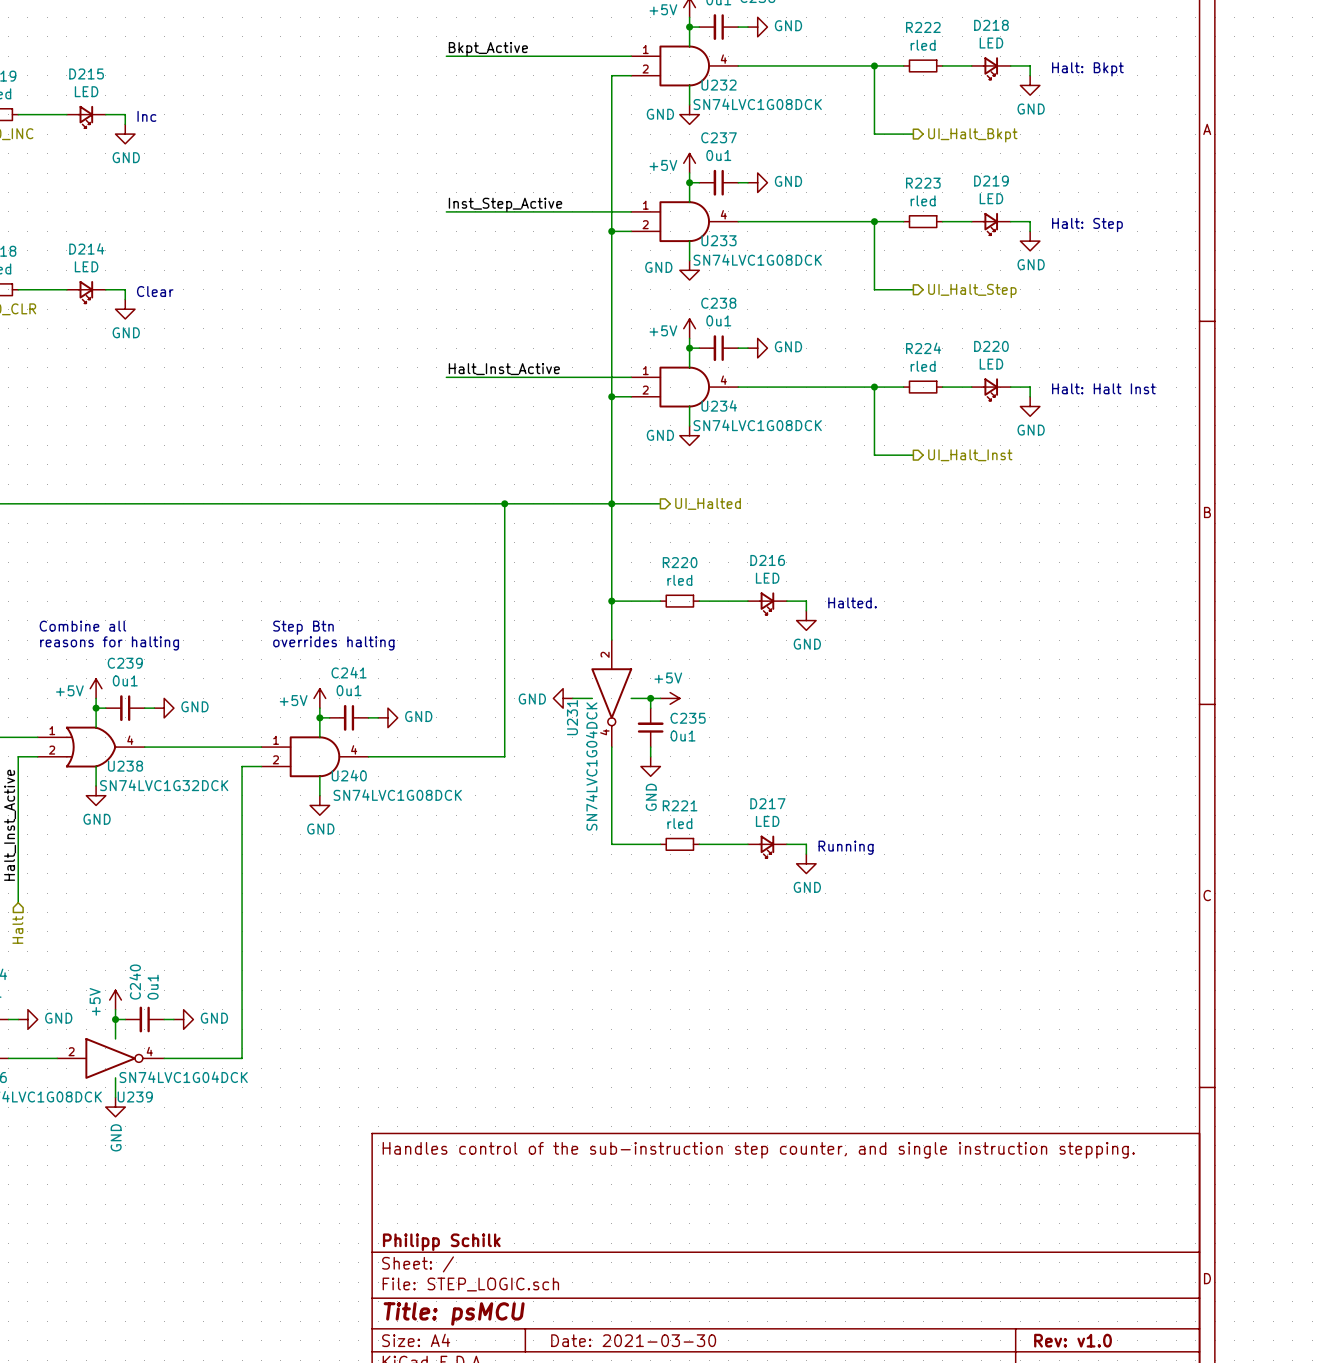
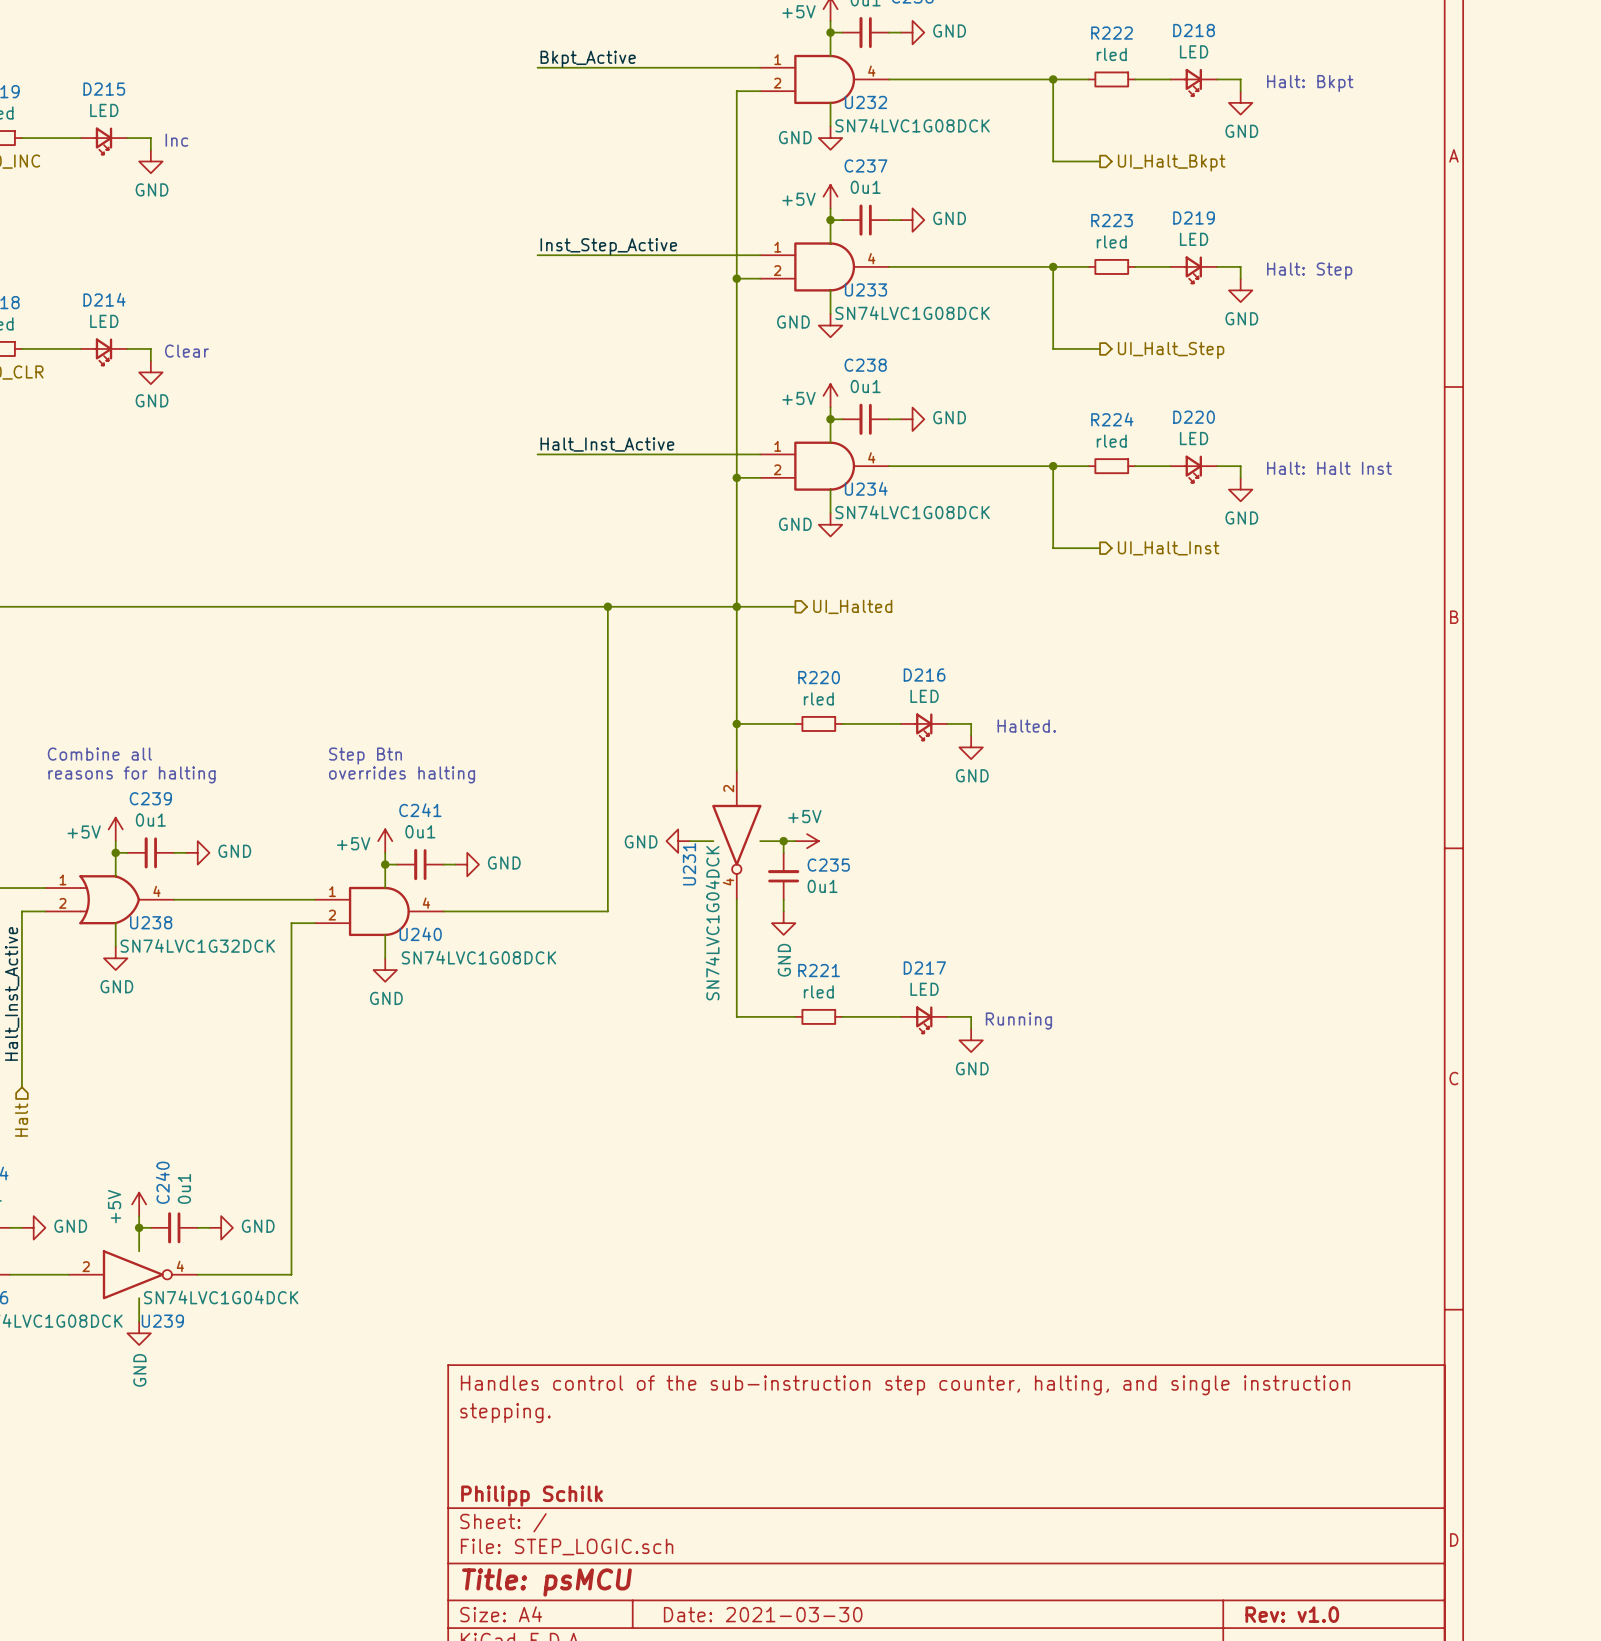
title block: Handles control of the sub-instruction step counter, and single instruction stepping. (758, 1150) -> Handles control of the sub-instruction step counter, halting, and single instruction (905, 1385)
title block: none -> stepping. (505, 1413)

